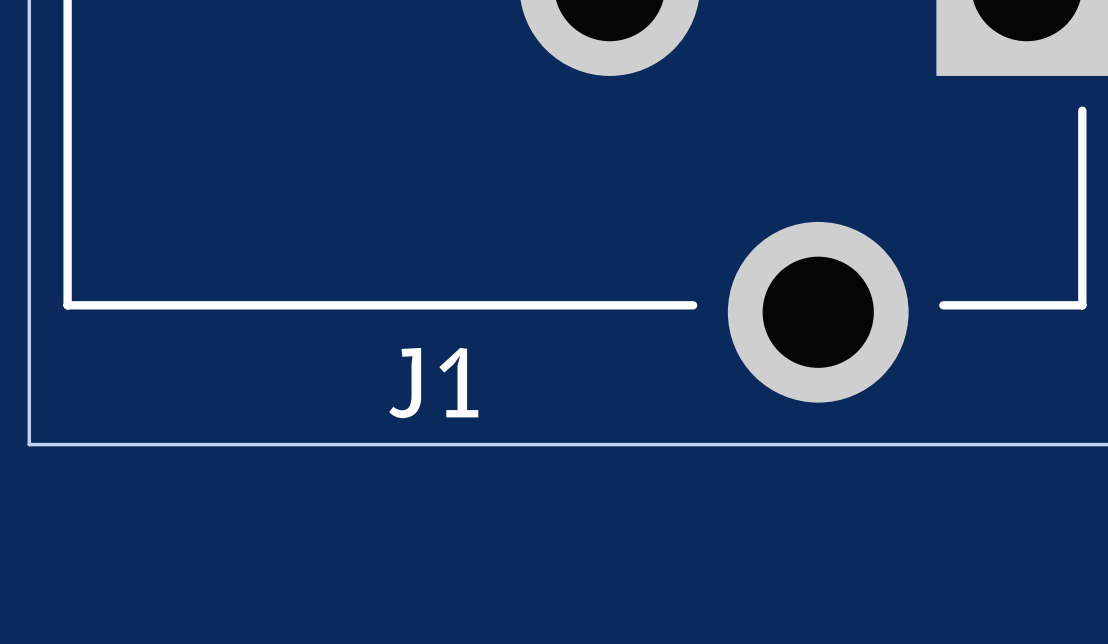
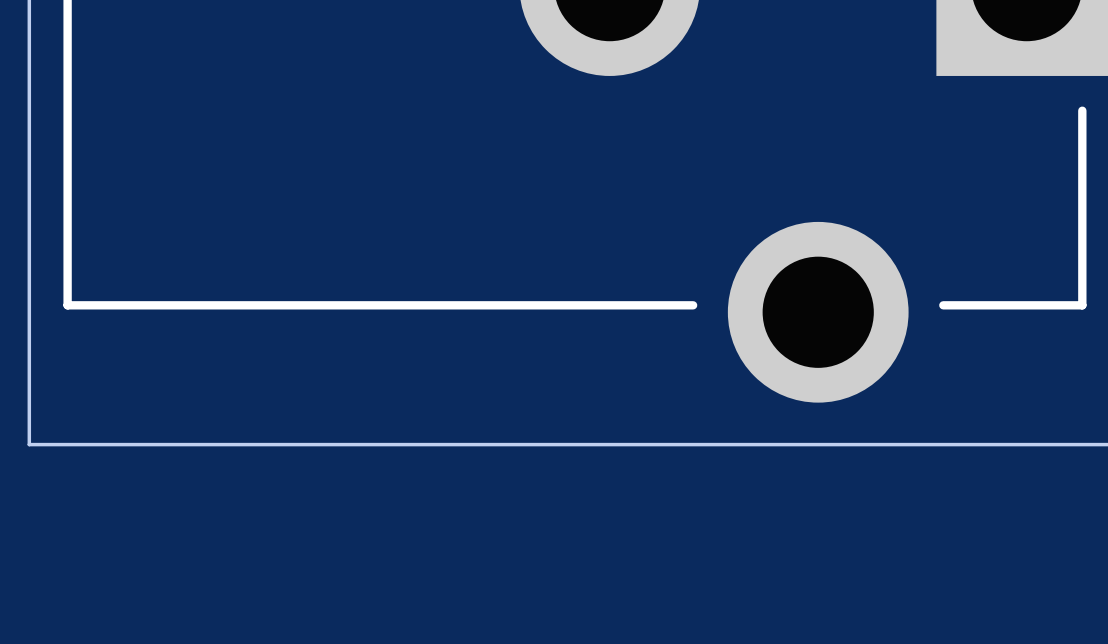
J1 name: J1 (433, 383) -> none

